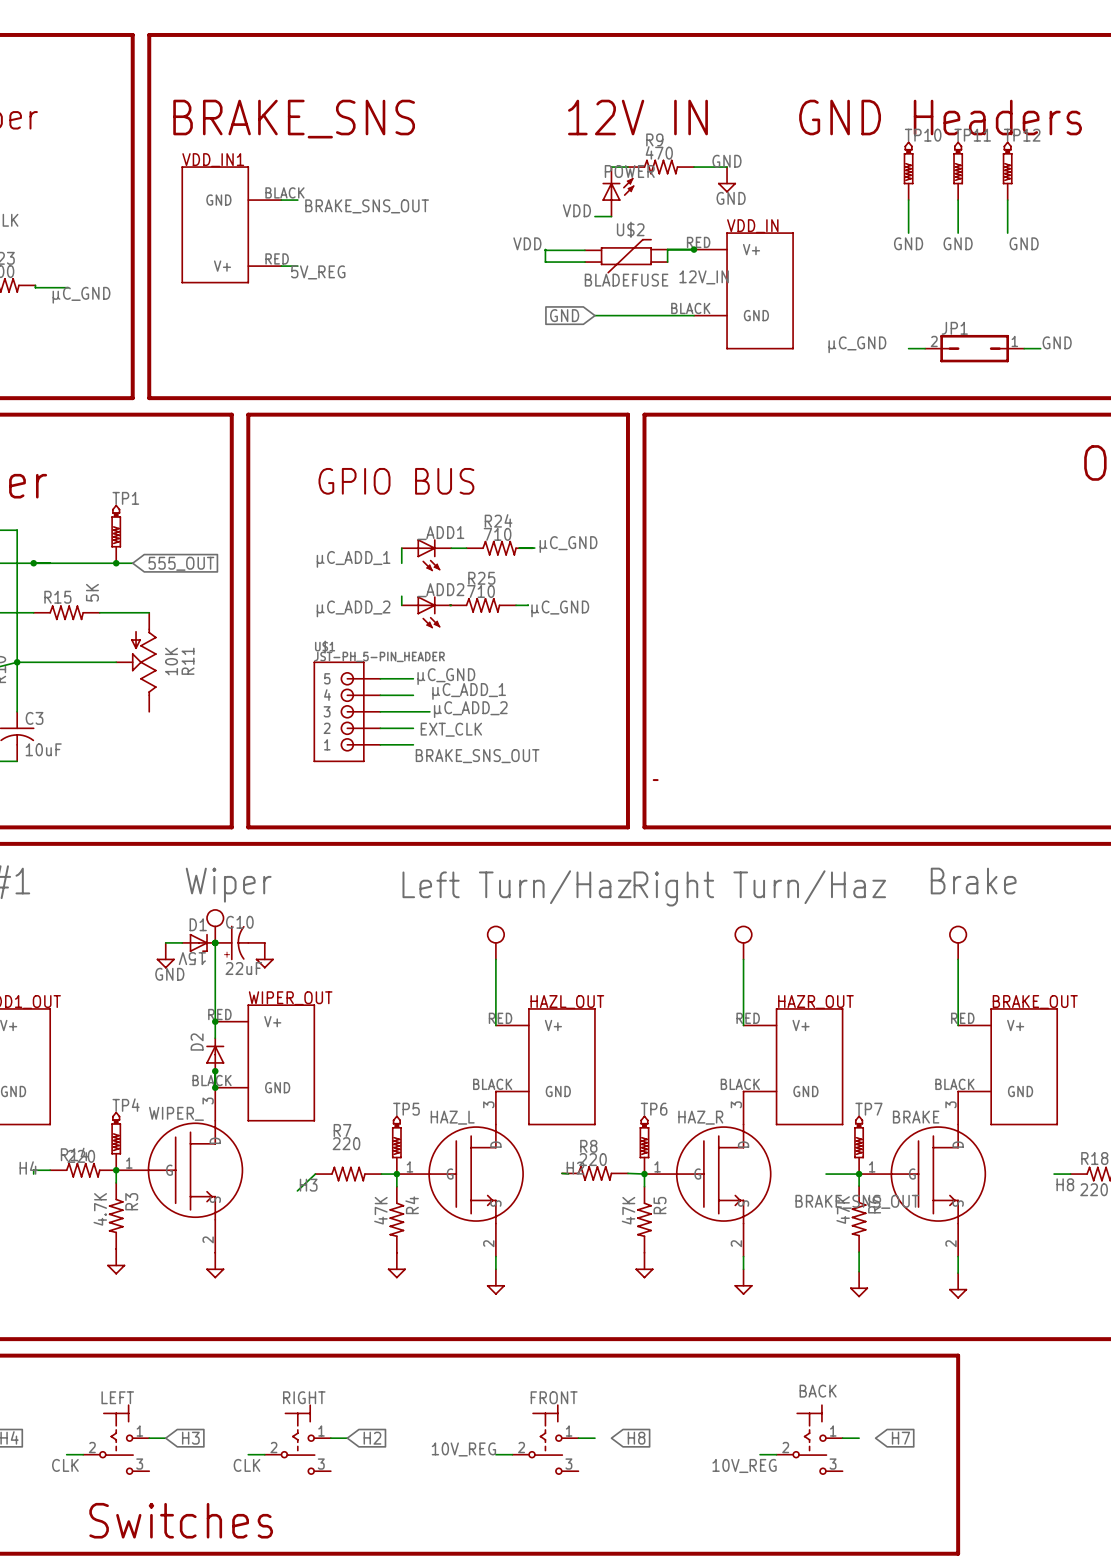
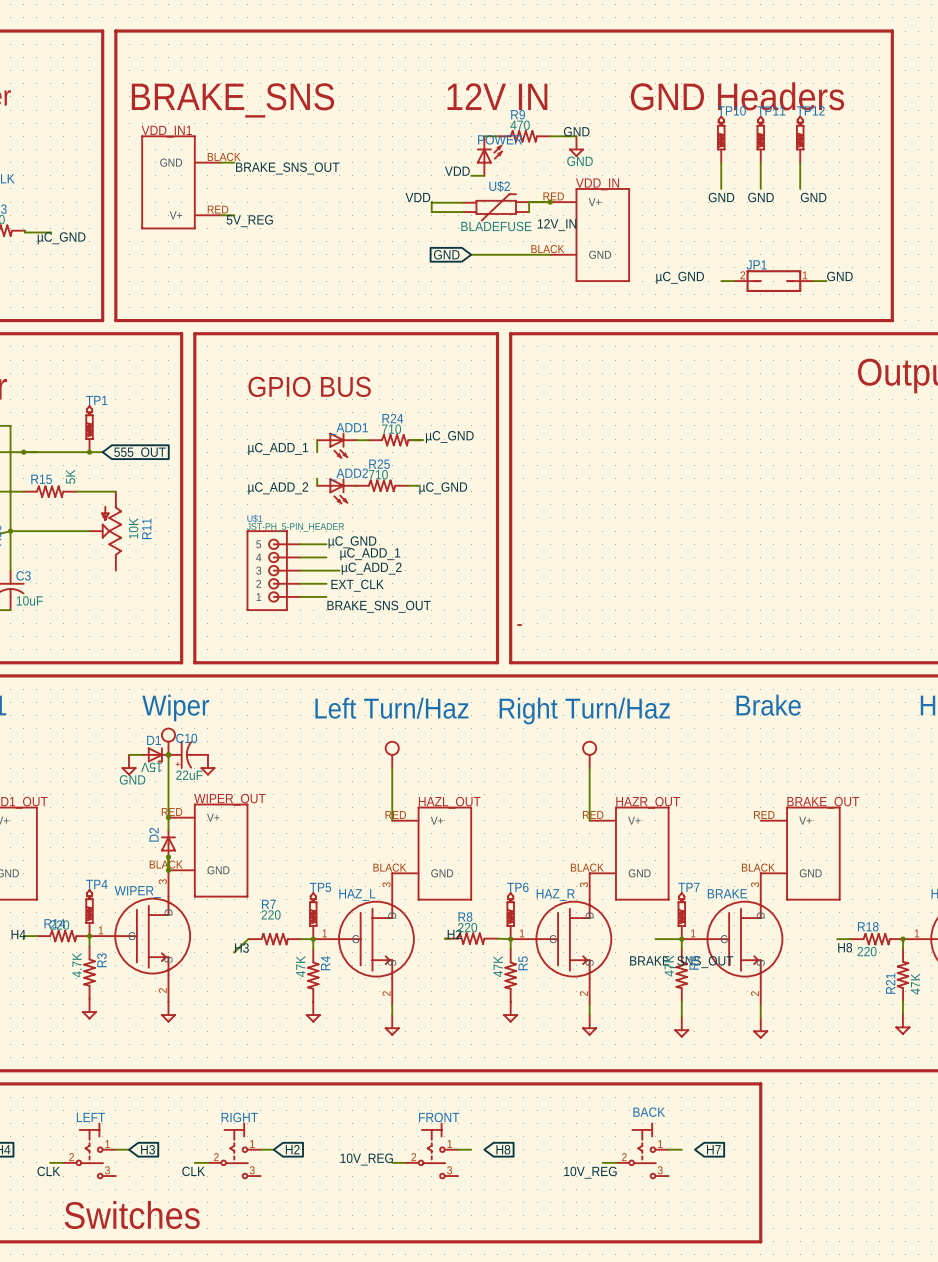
power symbol: (958, 942) -> none
wire: (958, 959) (958, 1025) -> none

